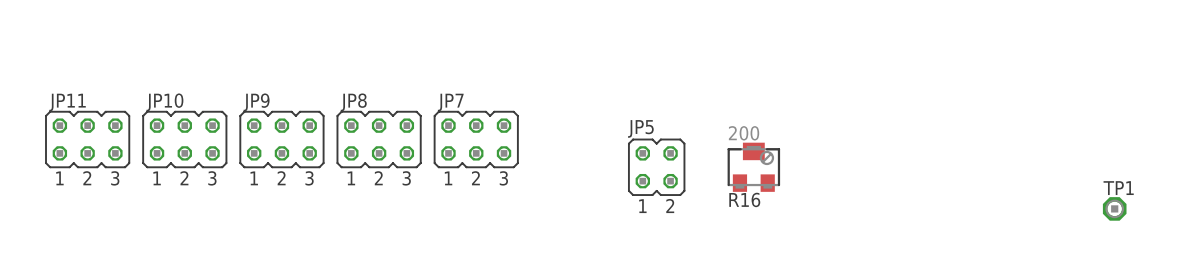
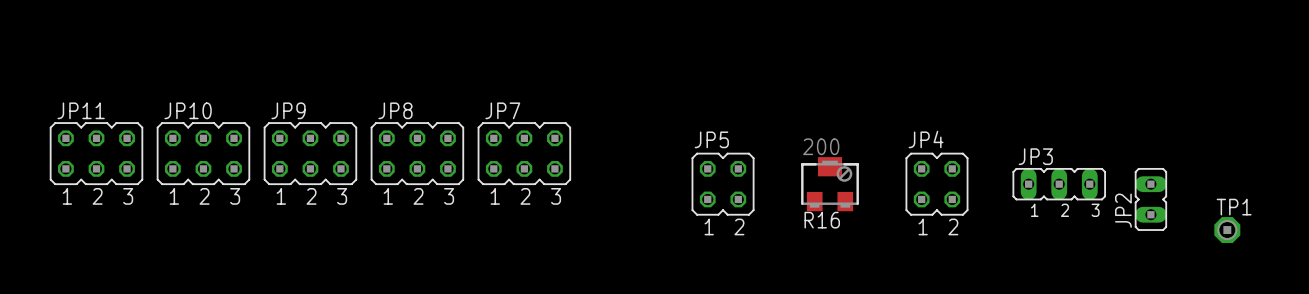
JP4: none -> (936, 184)
JP3: none -> (1059, 184)
JP2: none -> (1150, 199)

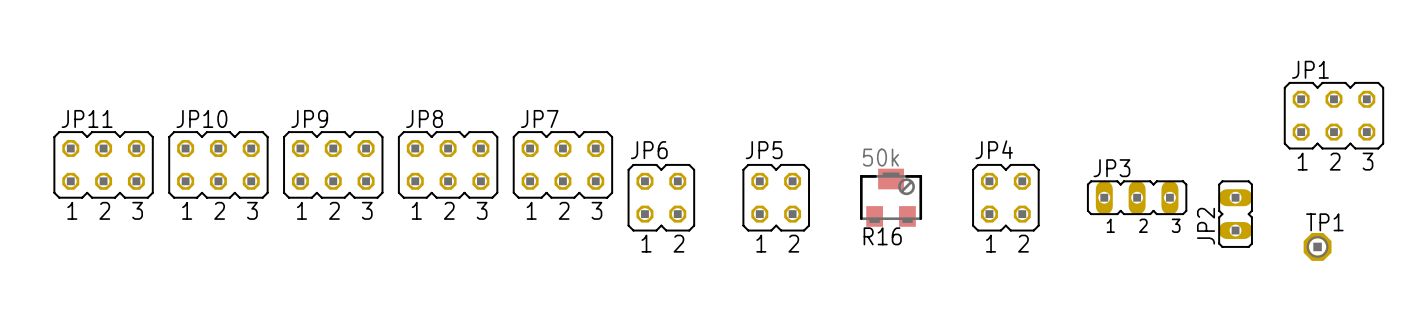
JP1: none -> (1333, 115)
R16 value: 200 (821, 146) -> 50k (880, 157)
JP6: none -> (661, 197)

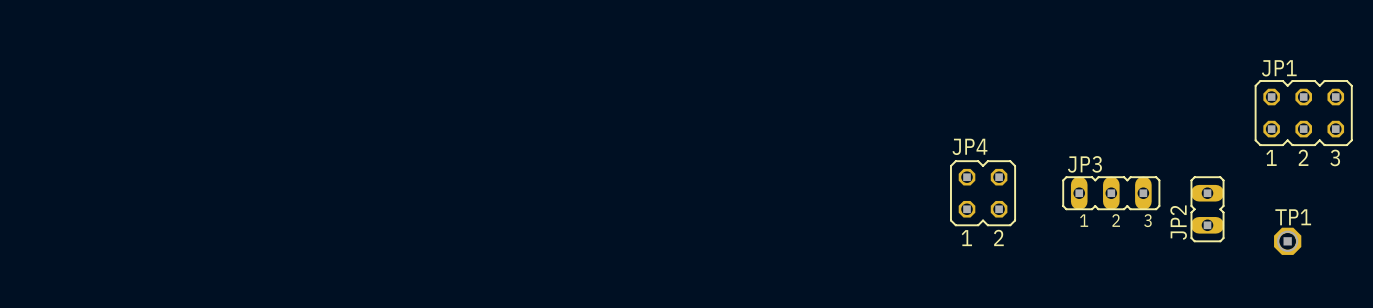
JP11: (103, 164) -> none
JP10: (218, 164) -> none
JP9: (333, 164) -> none
JP8: (448, 164) -> none
JP7: (562, 164) -> none
JP6: (661, 197) -> none
JP5: (776, 197) -> none
R16: 50k (891, 197) -> none

